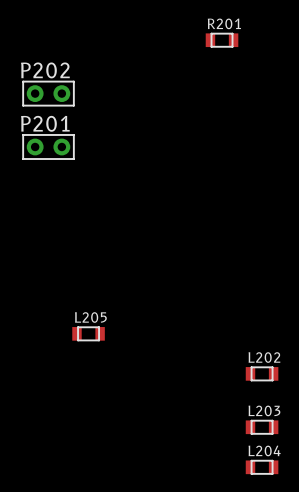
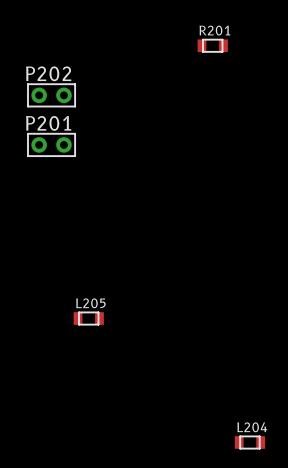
L202: (262, 373) -> none
L203: (262, 427) -> none

